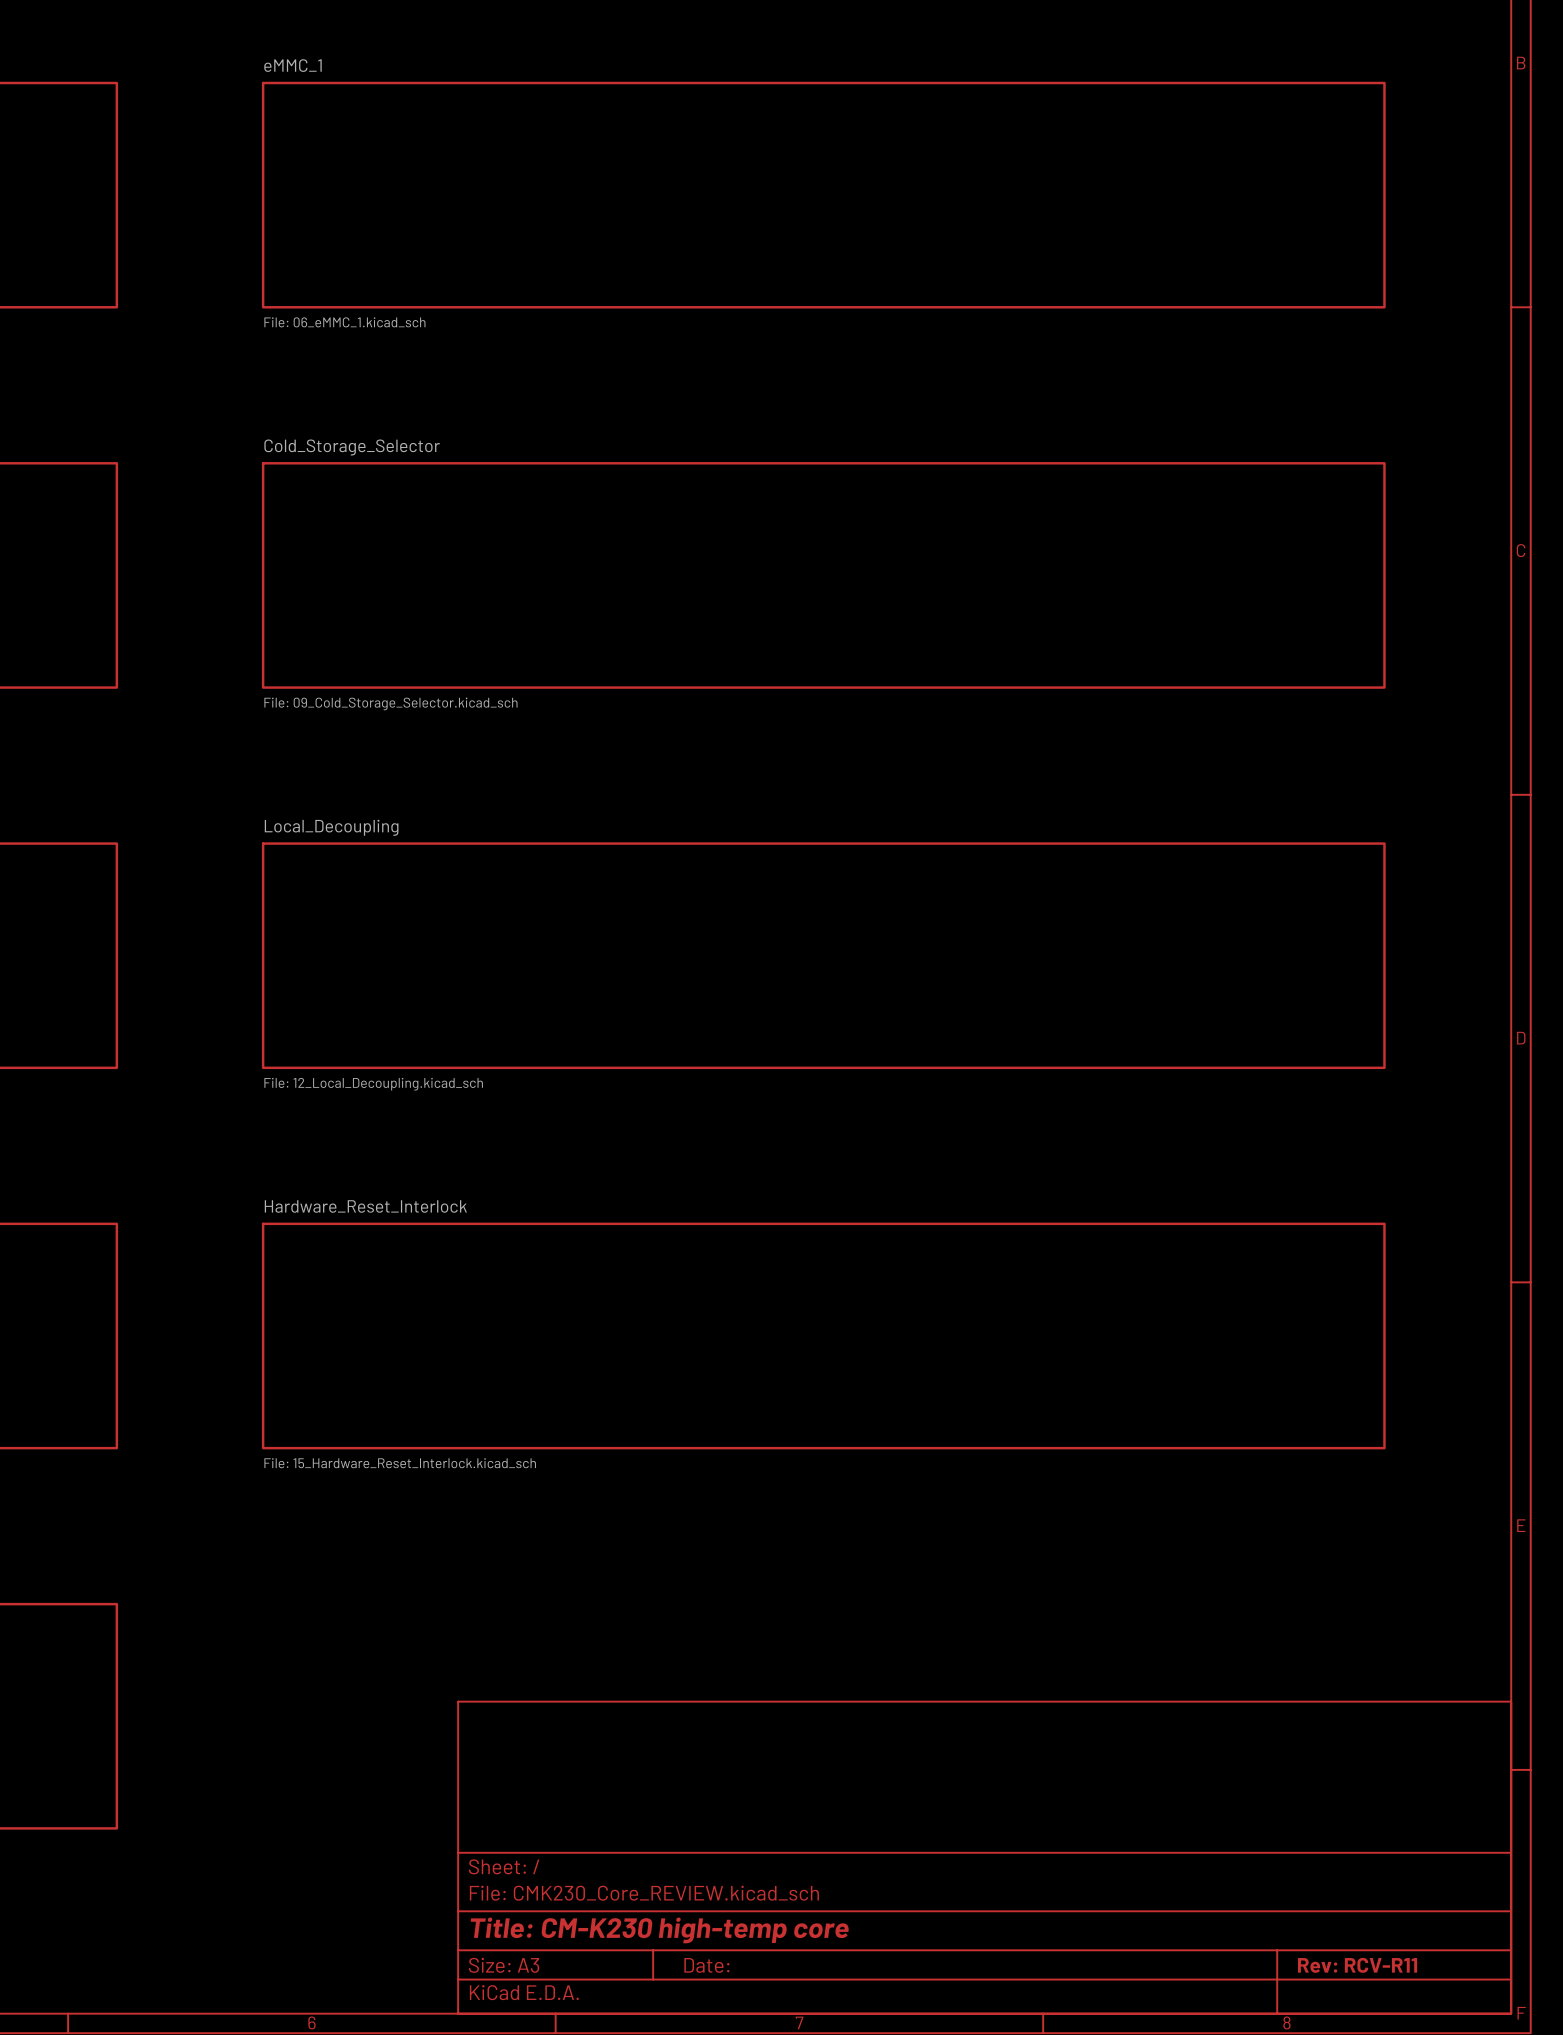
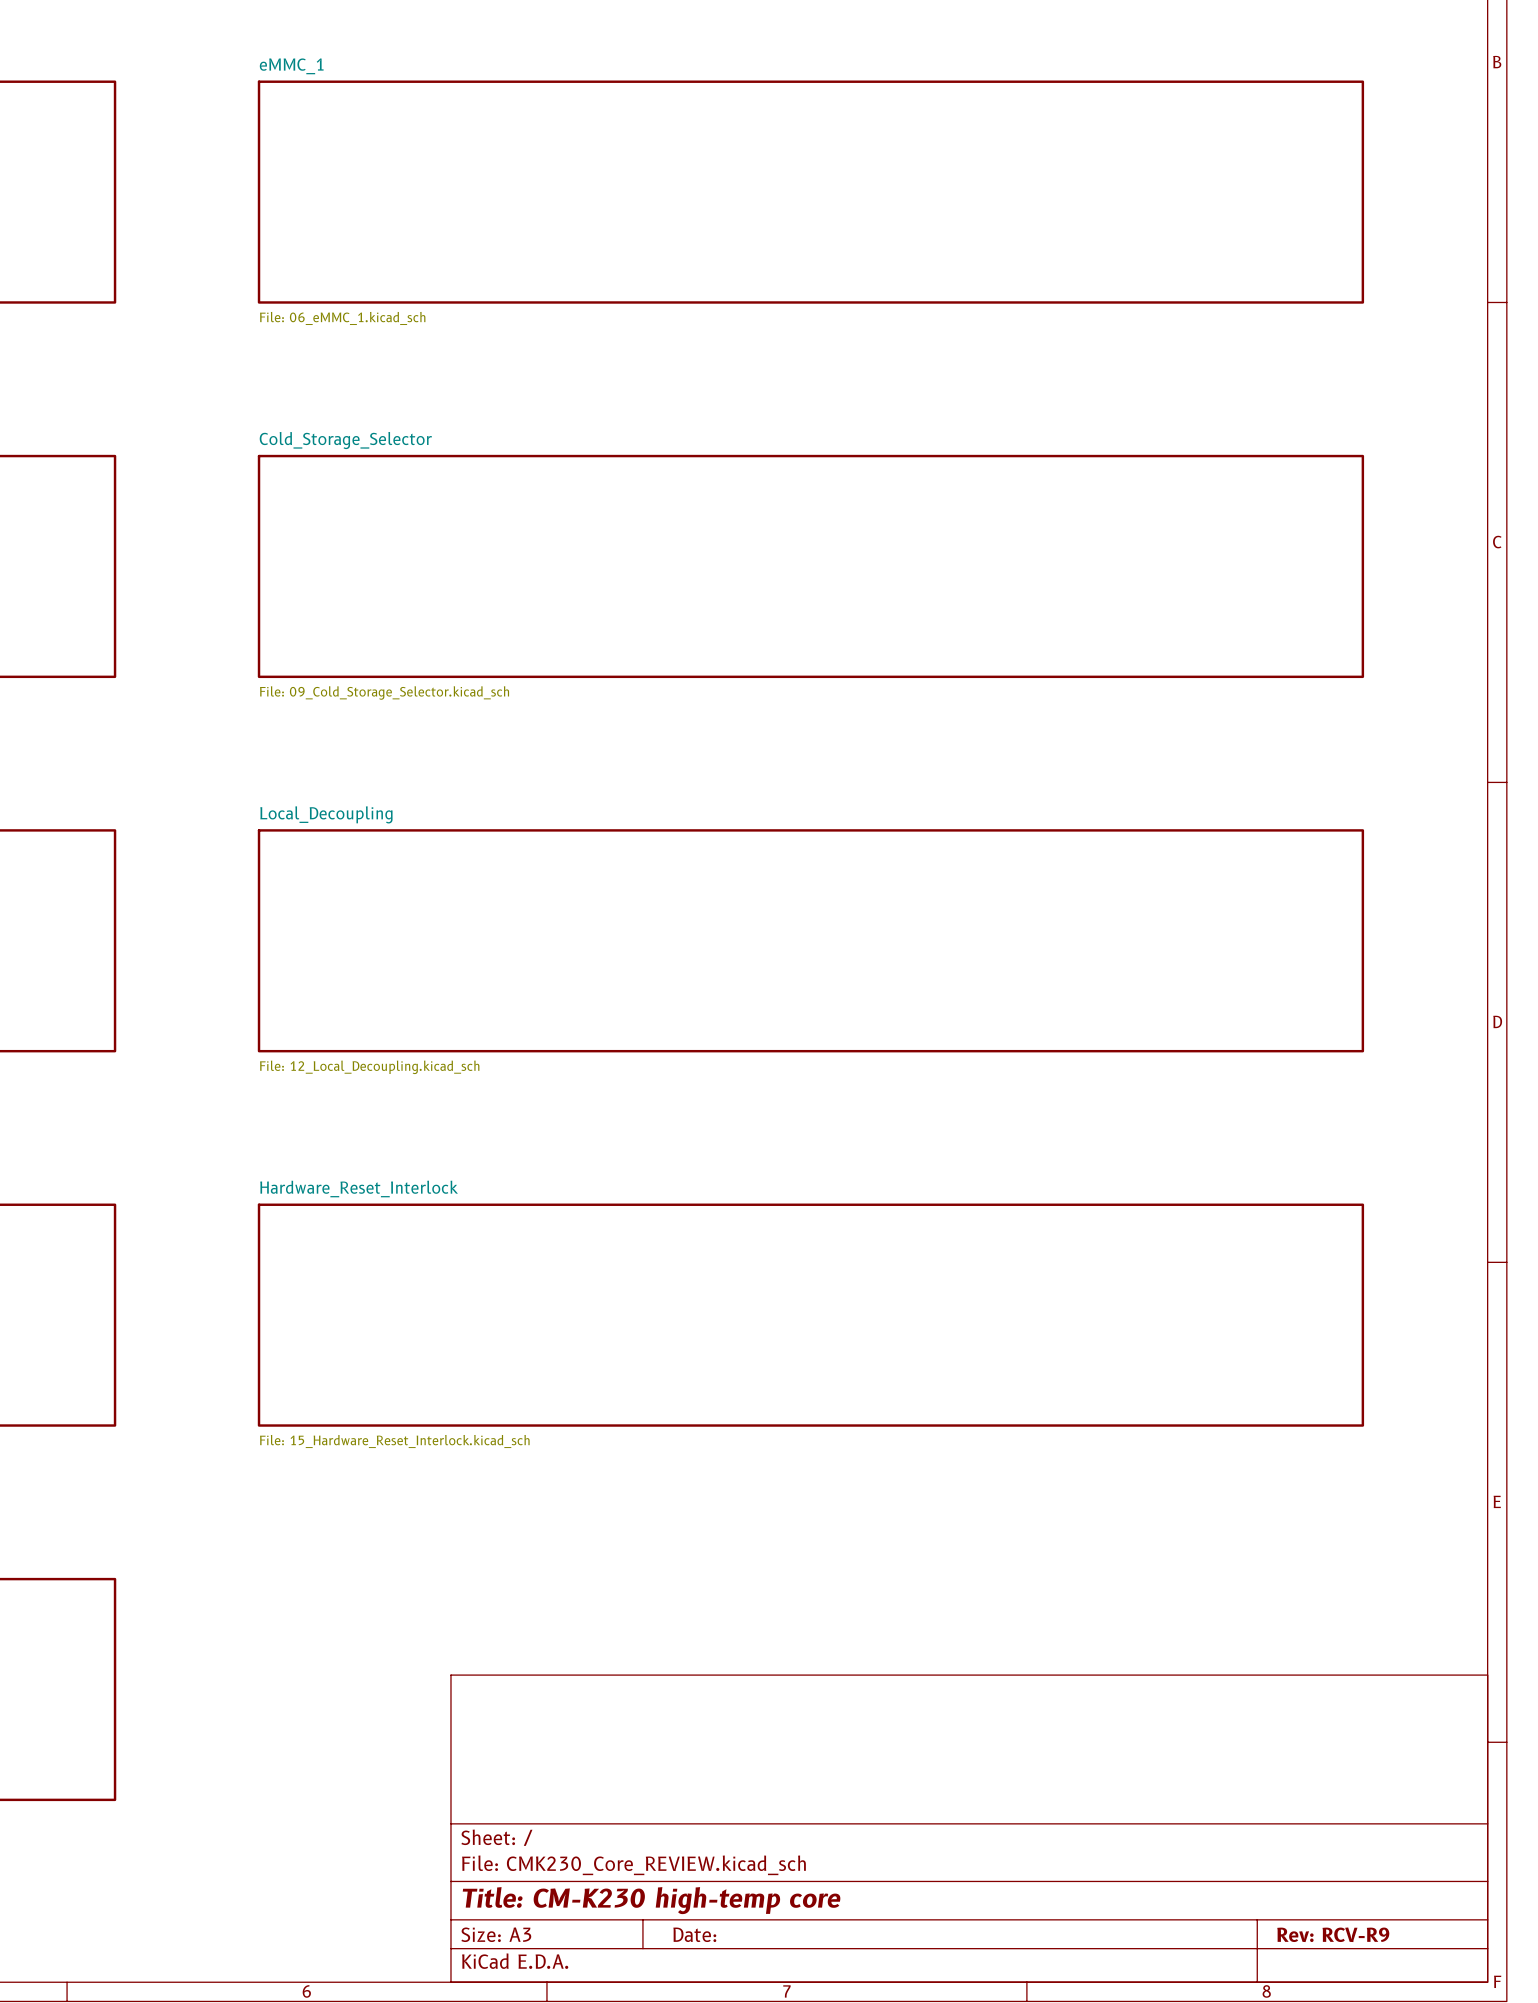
title block: Rev: RCV-R11 (1357, 1965) -> Rev: RCV-R9 (1333, 1934)

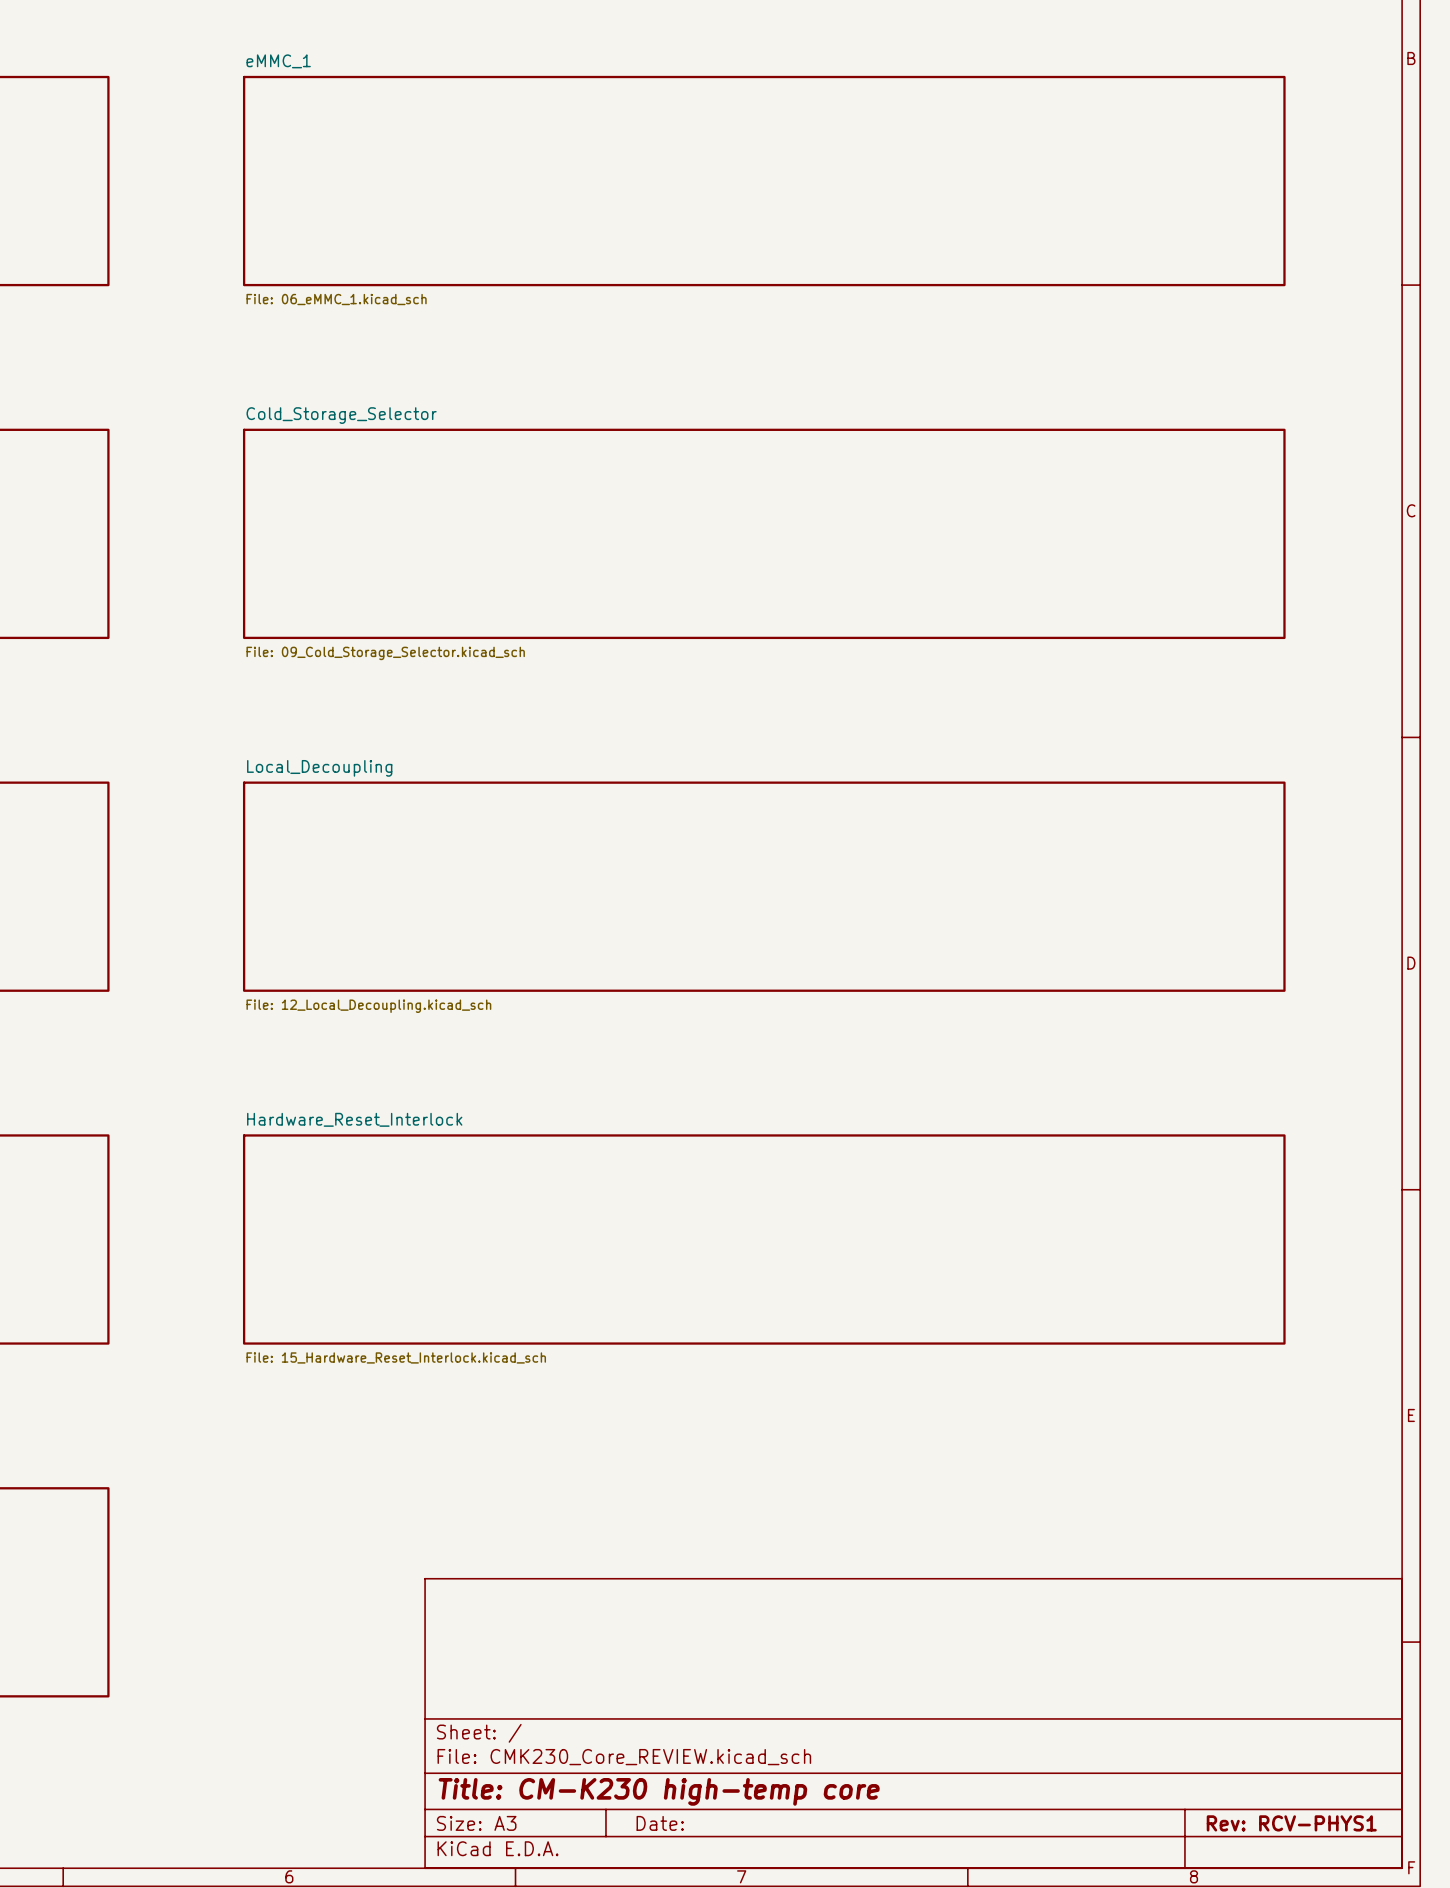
title block: Rev: RCV-R9 (1333, 1934) -> Rev: RCV-PHYS1 (1291, 1823)

